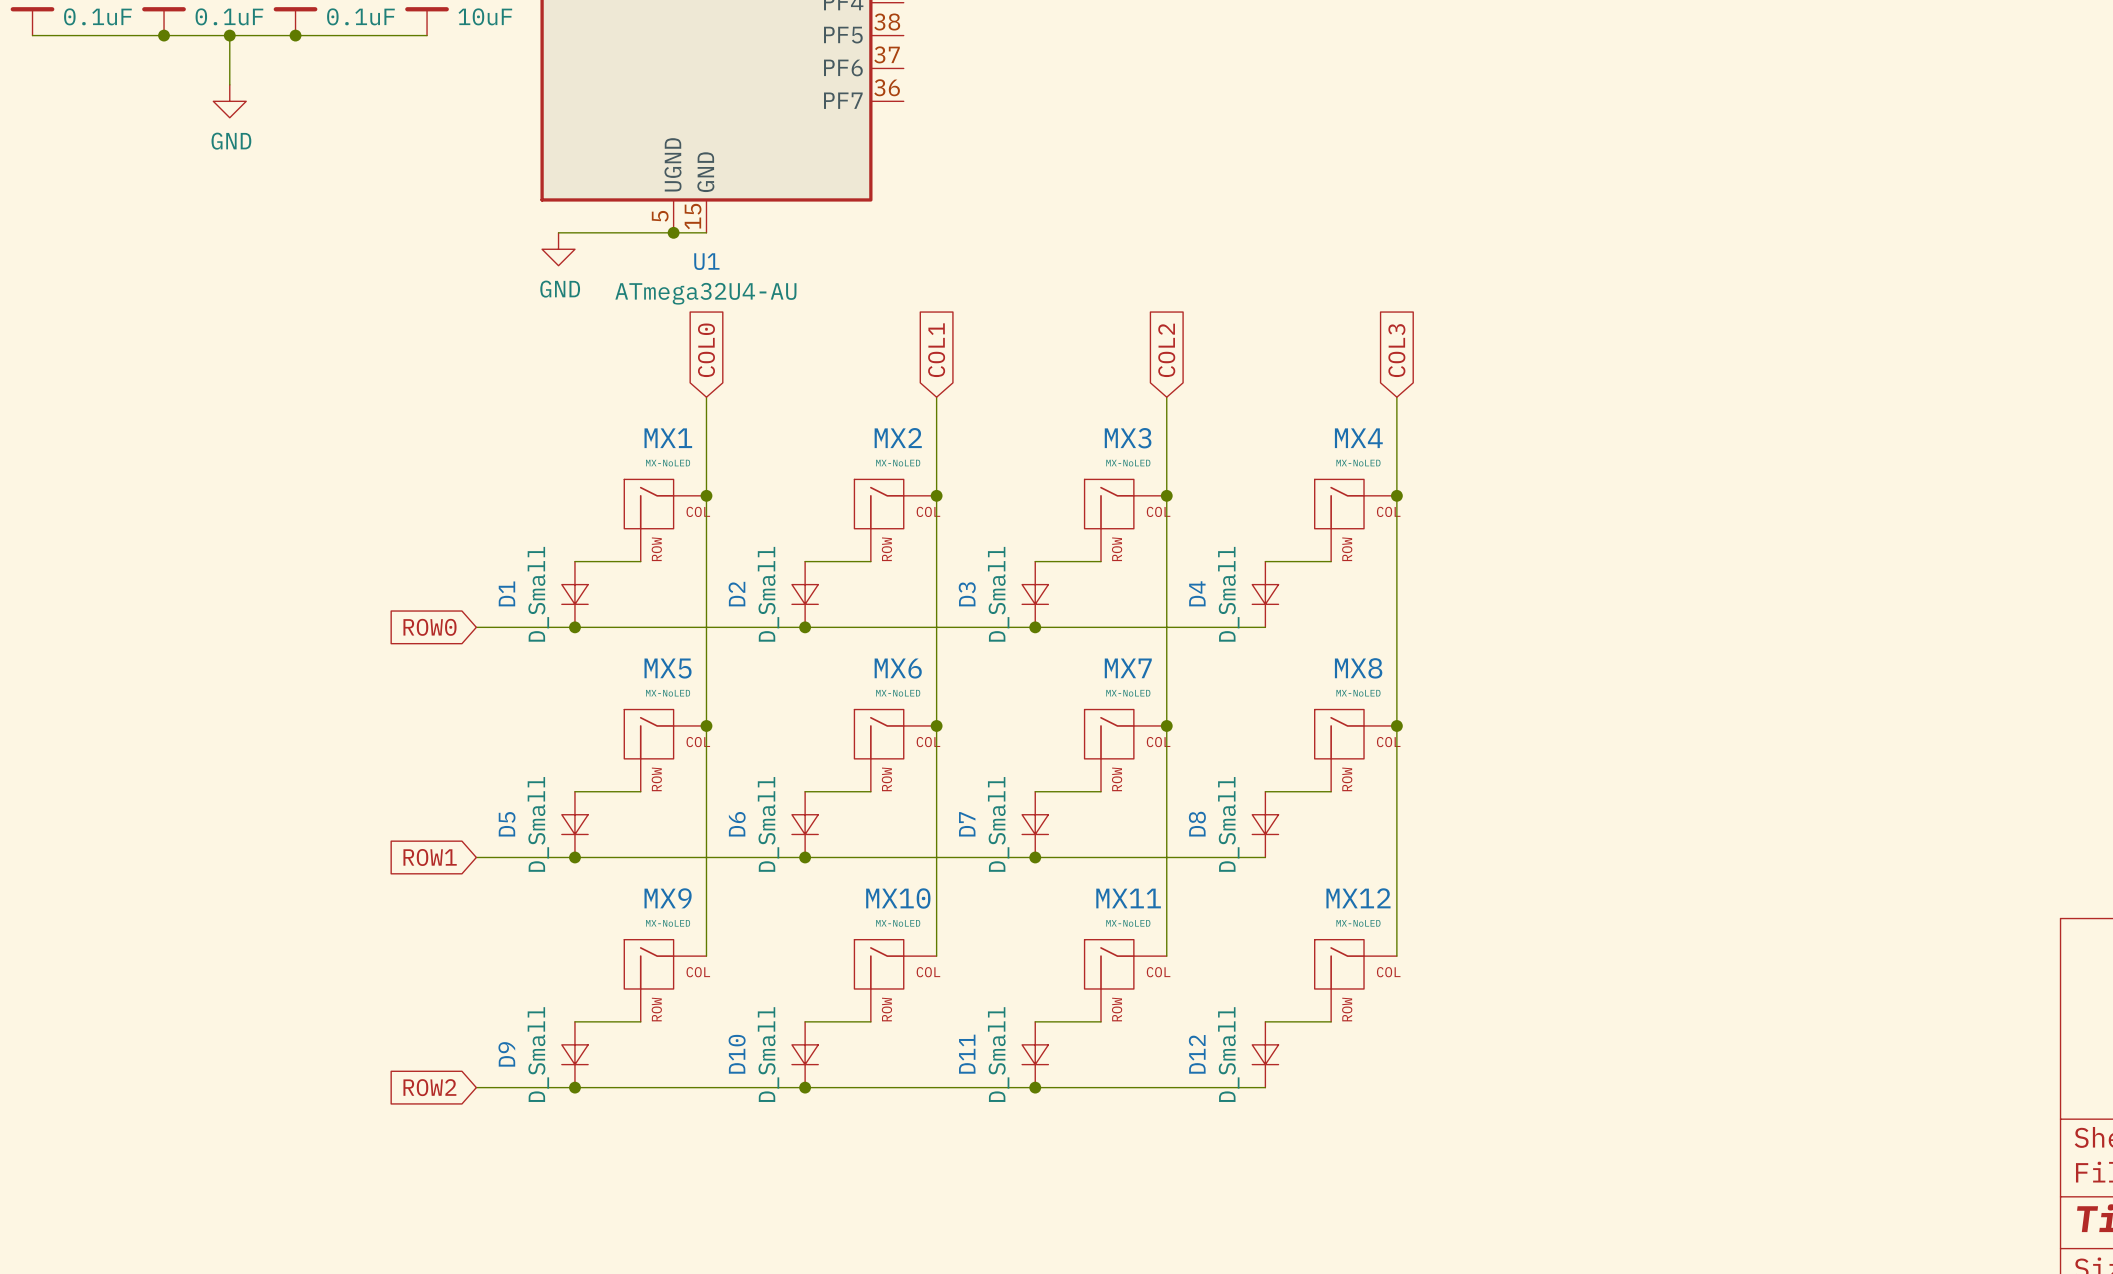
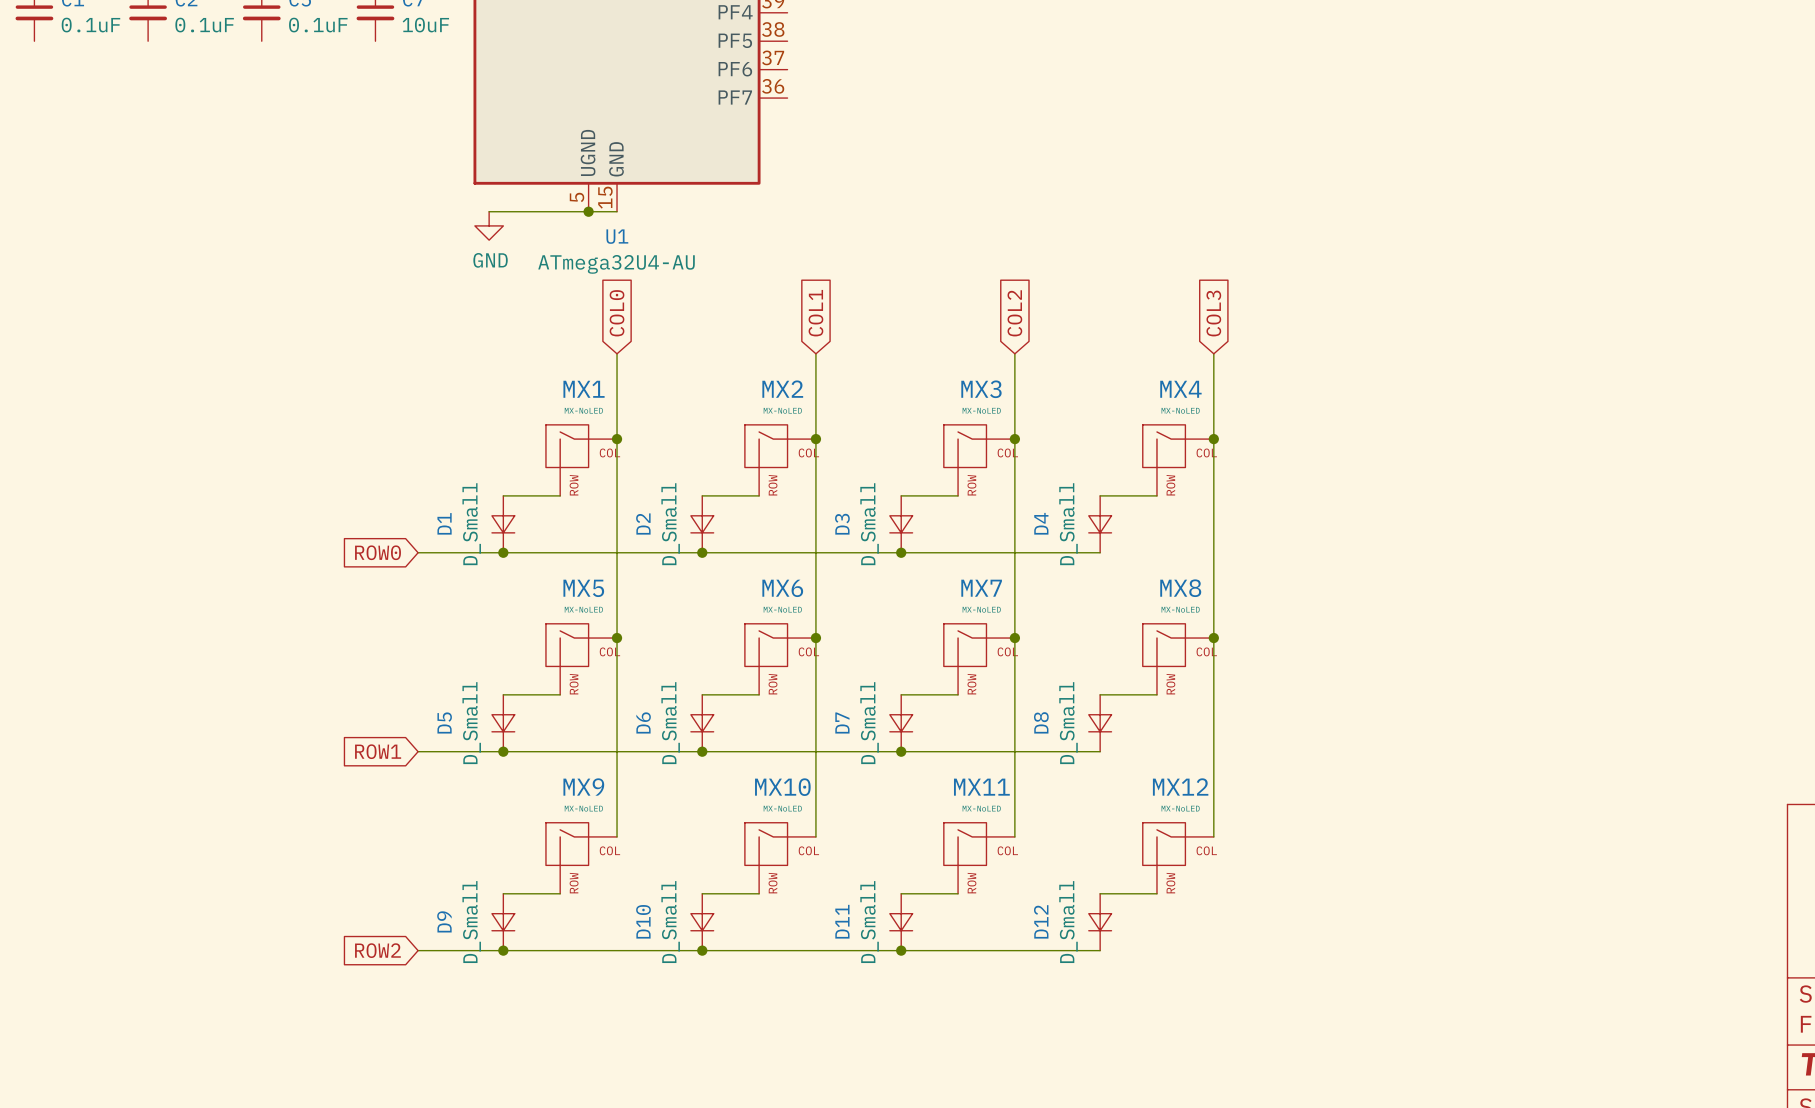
wire: (32, 35) (427, 35) -> none
junction: (164, 35) -> none
wire: (229, 35) (229, 84) -> none
junction: (229, 35) -> none
junction: (295, 35) -> none
power symbol: GND (229, 101) -> none

